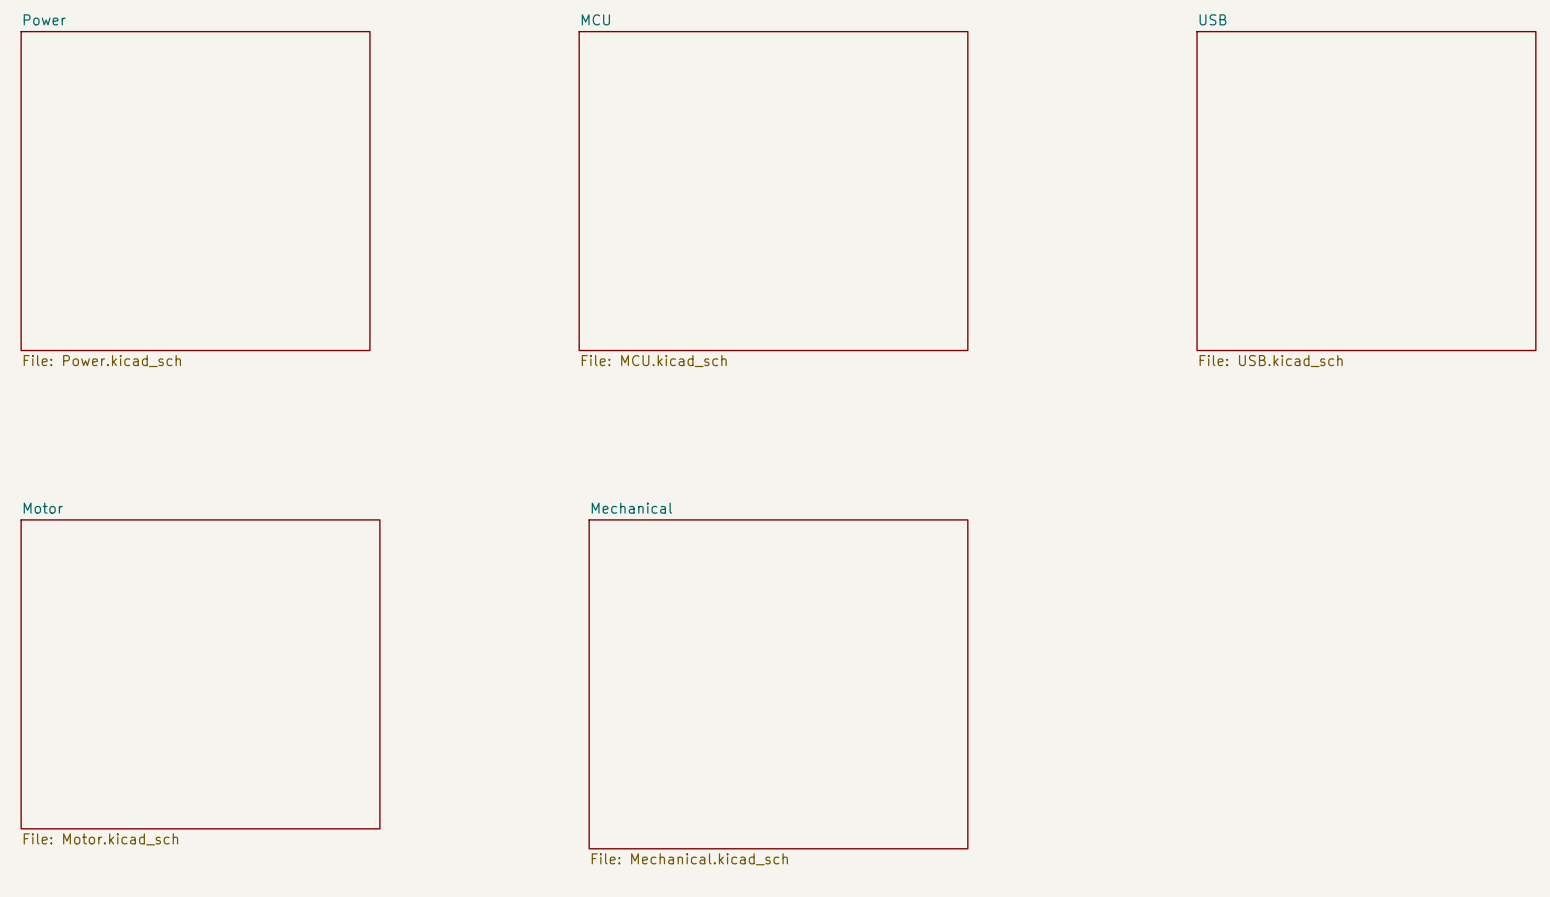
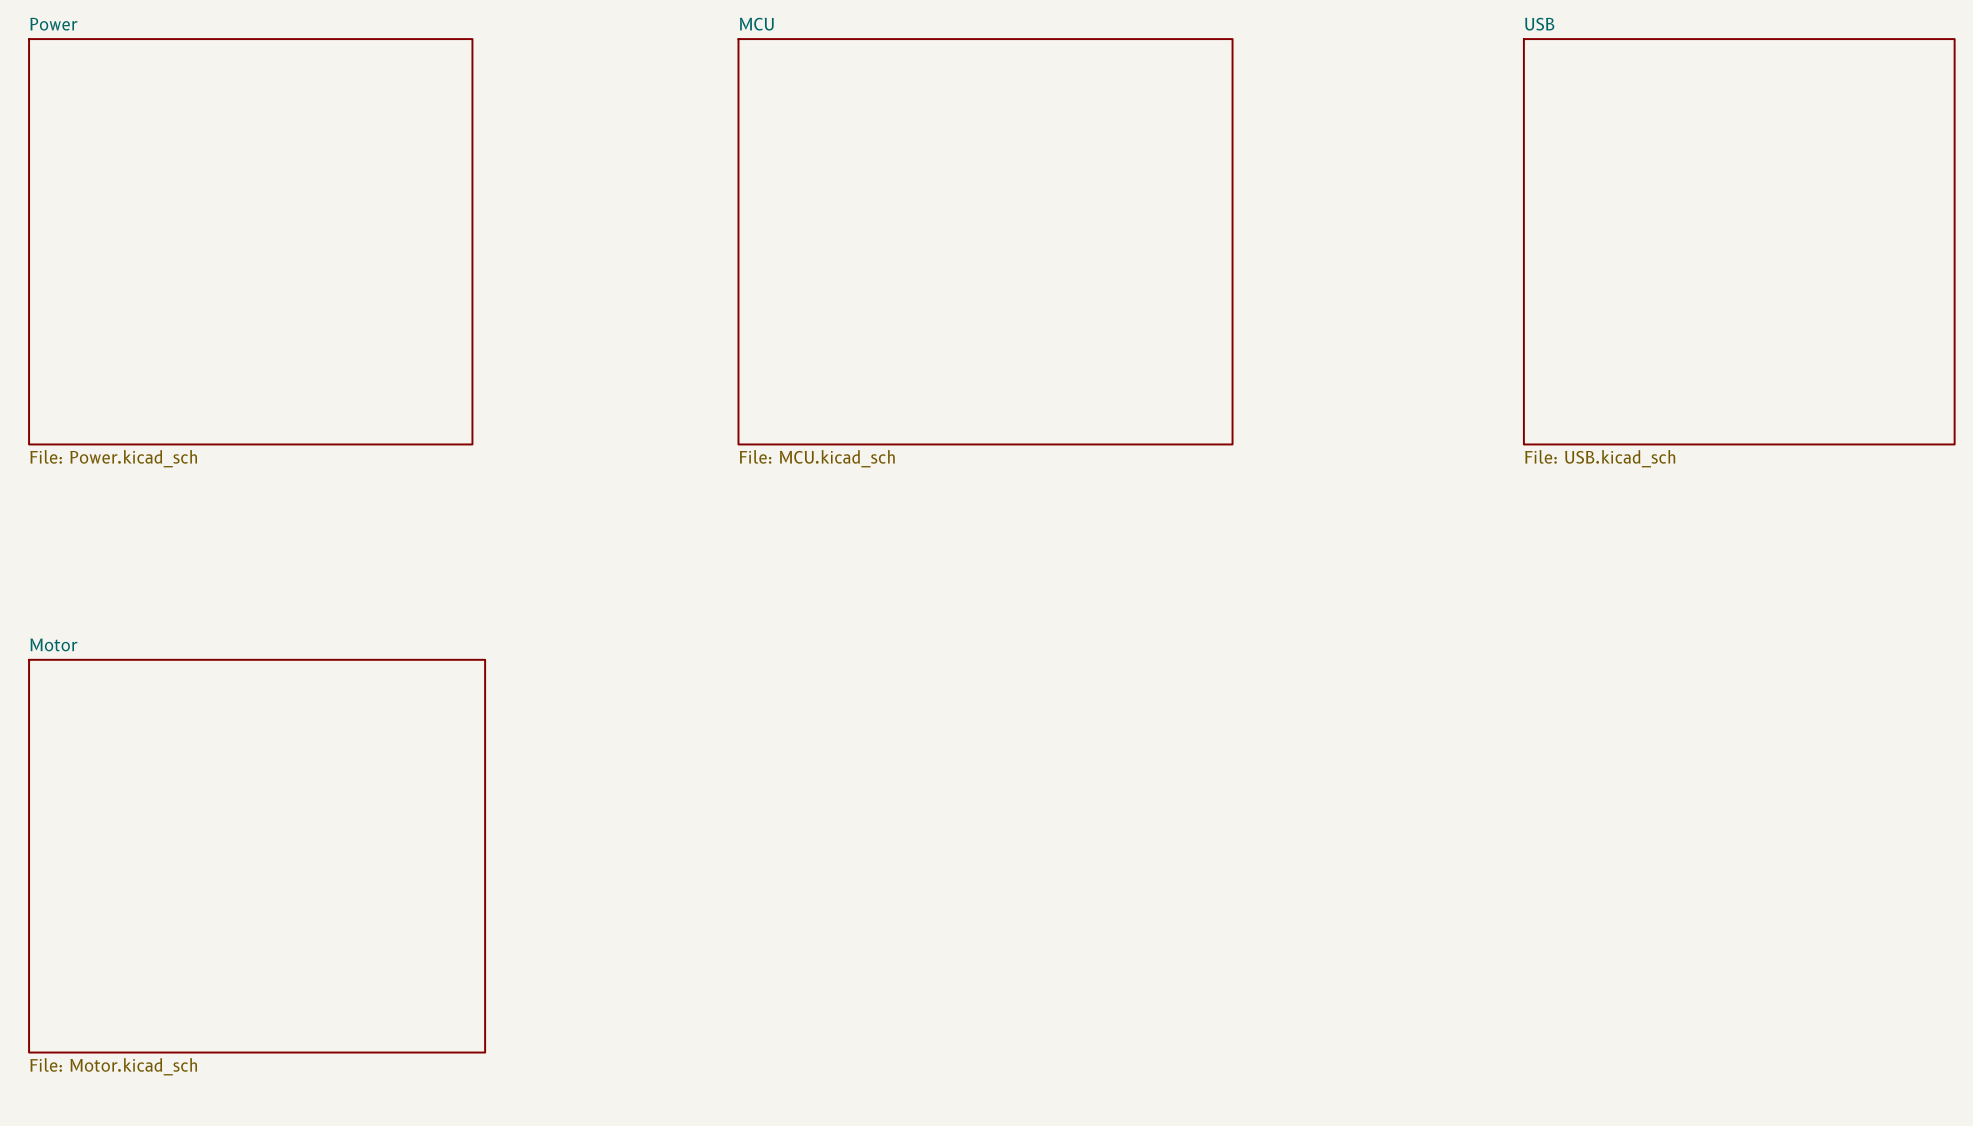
sheet Mechanical: File: Mechanical.kicad_sch (778, 684) -> none

